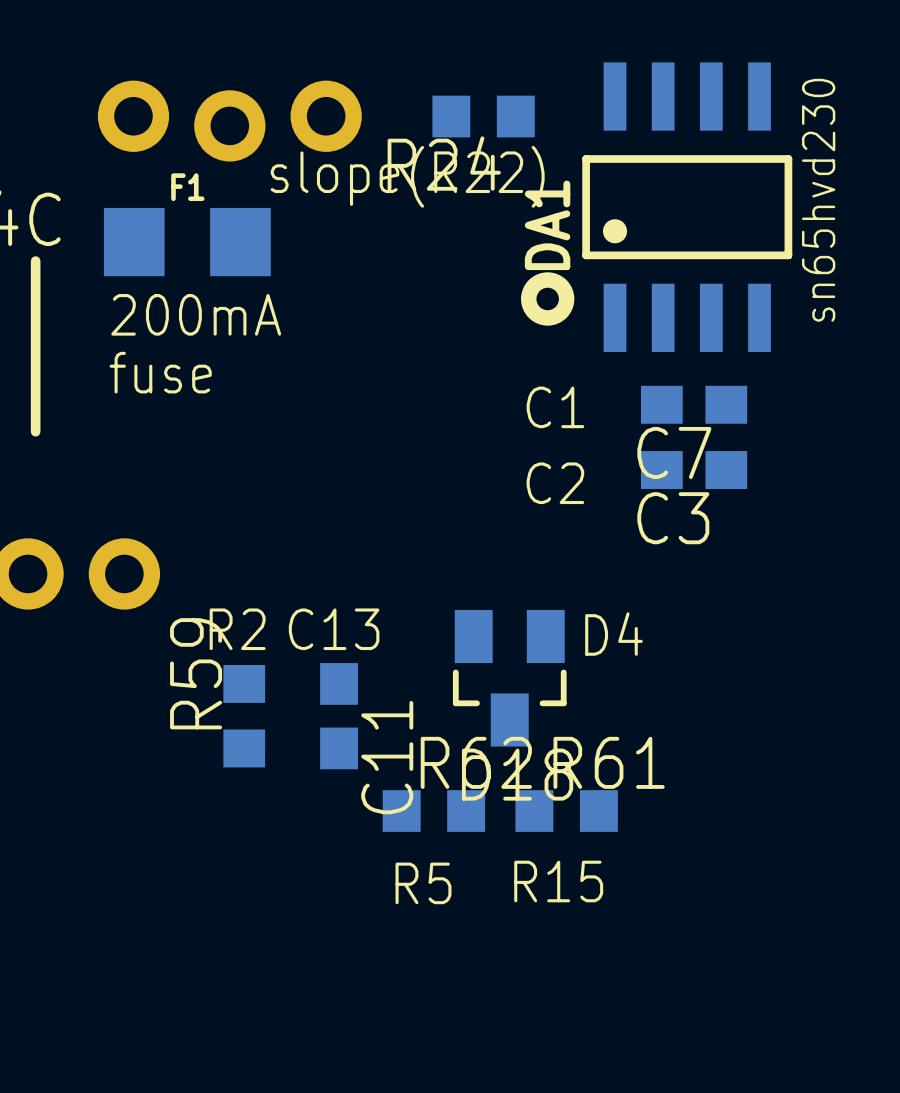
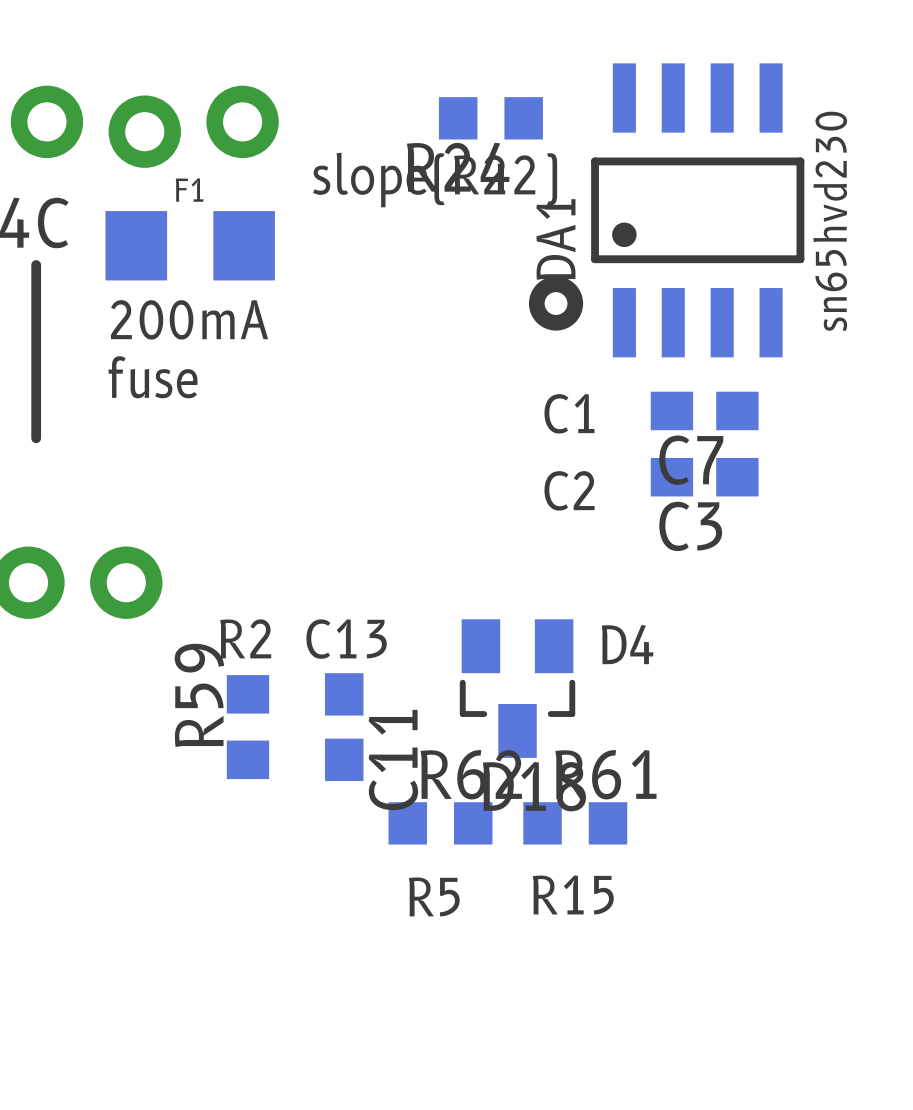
part position: (229, 121) -> (144, 126)

